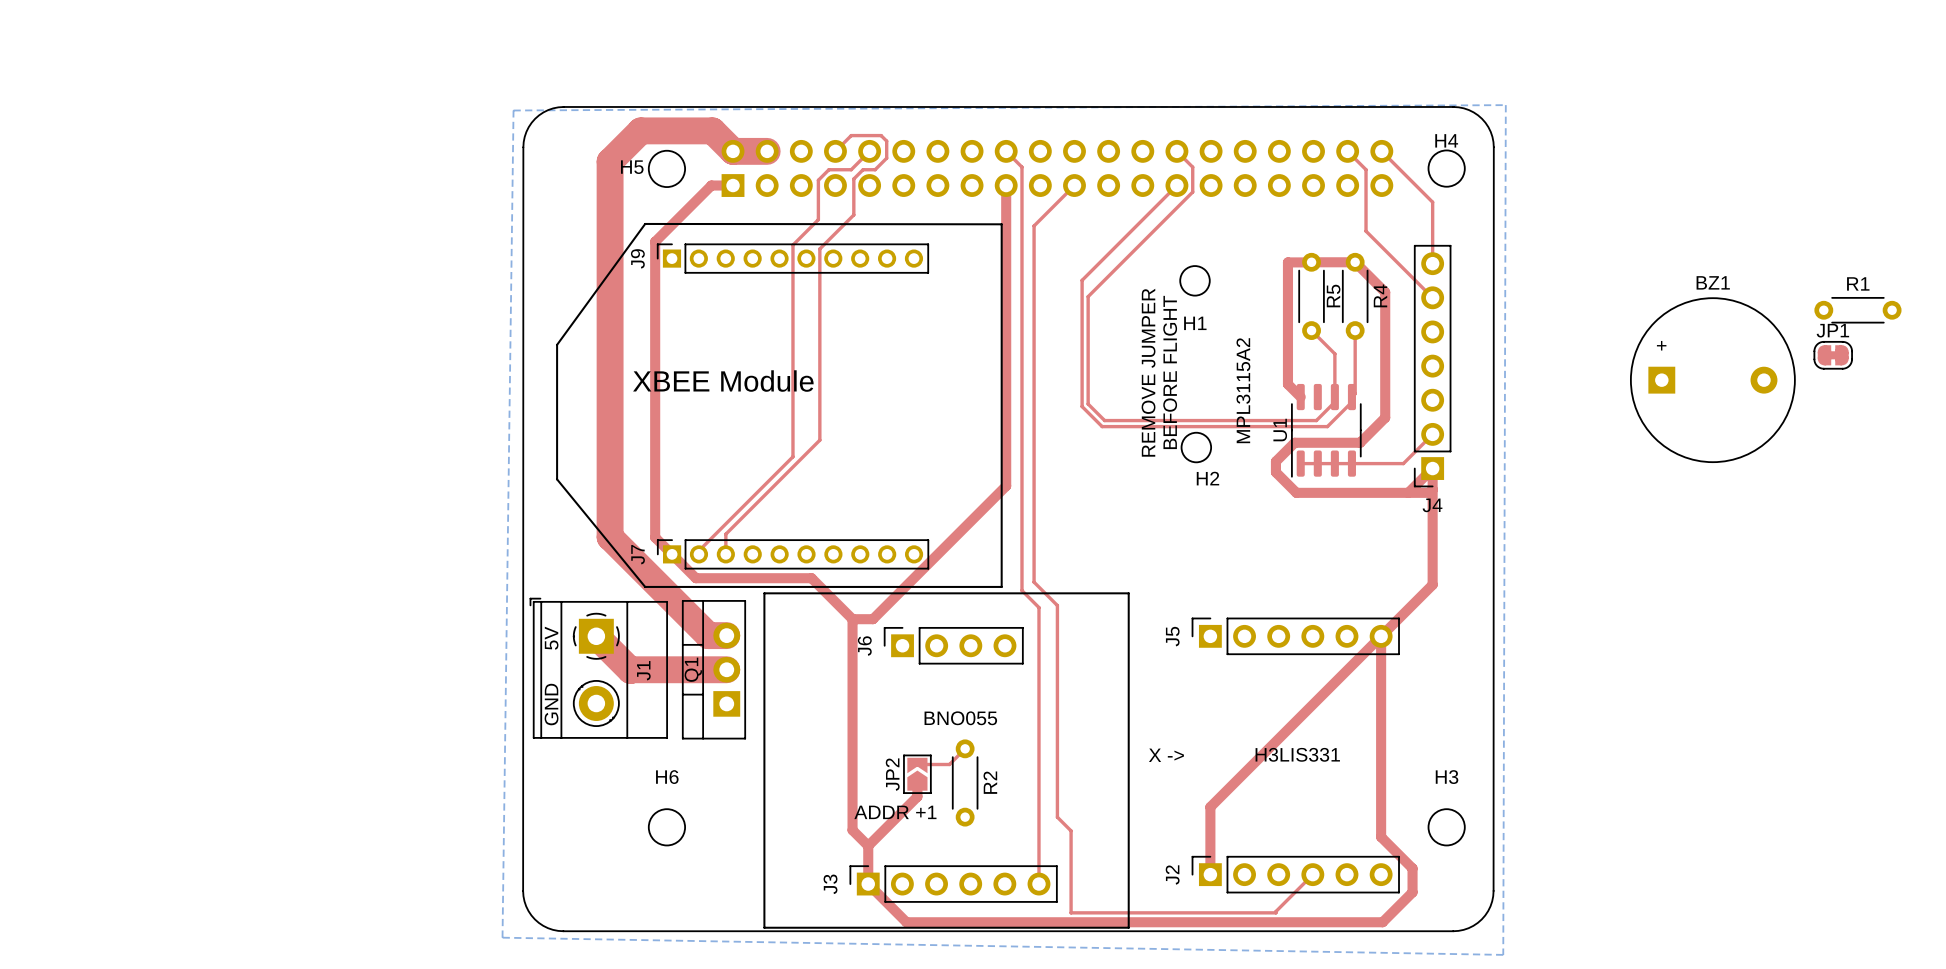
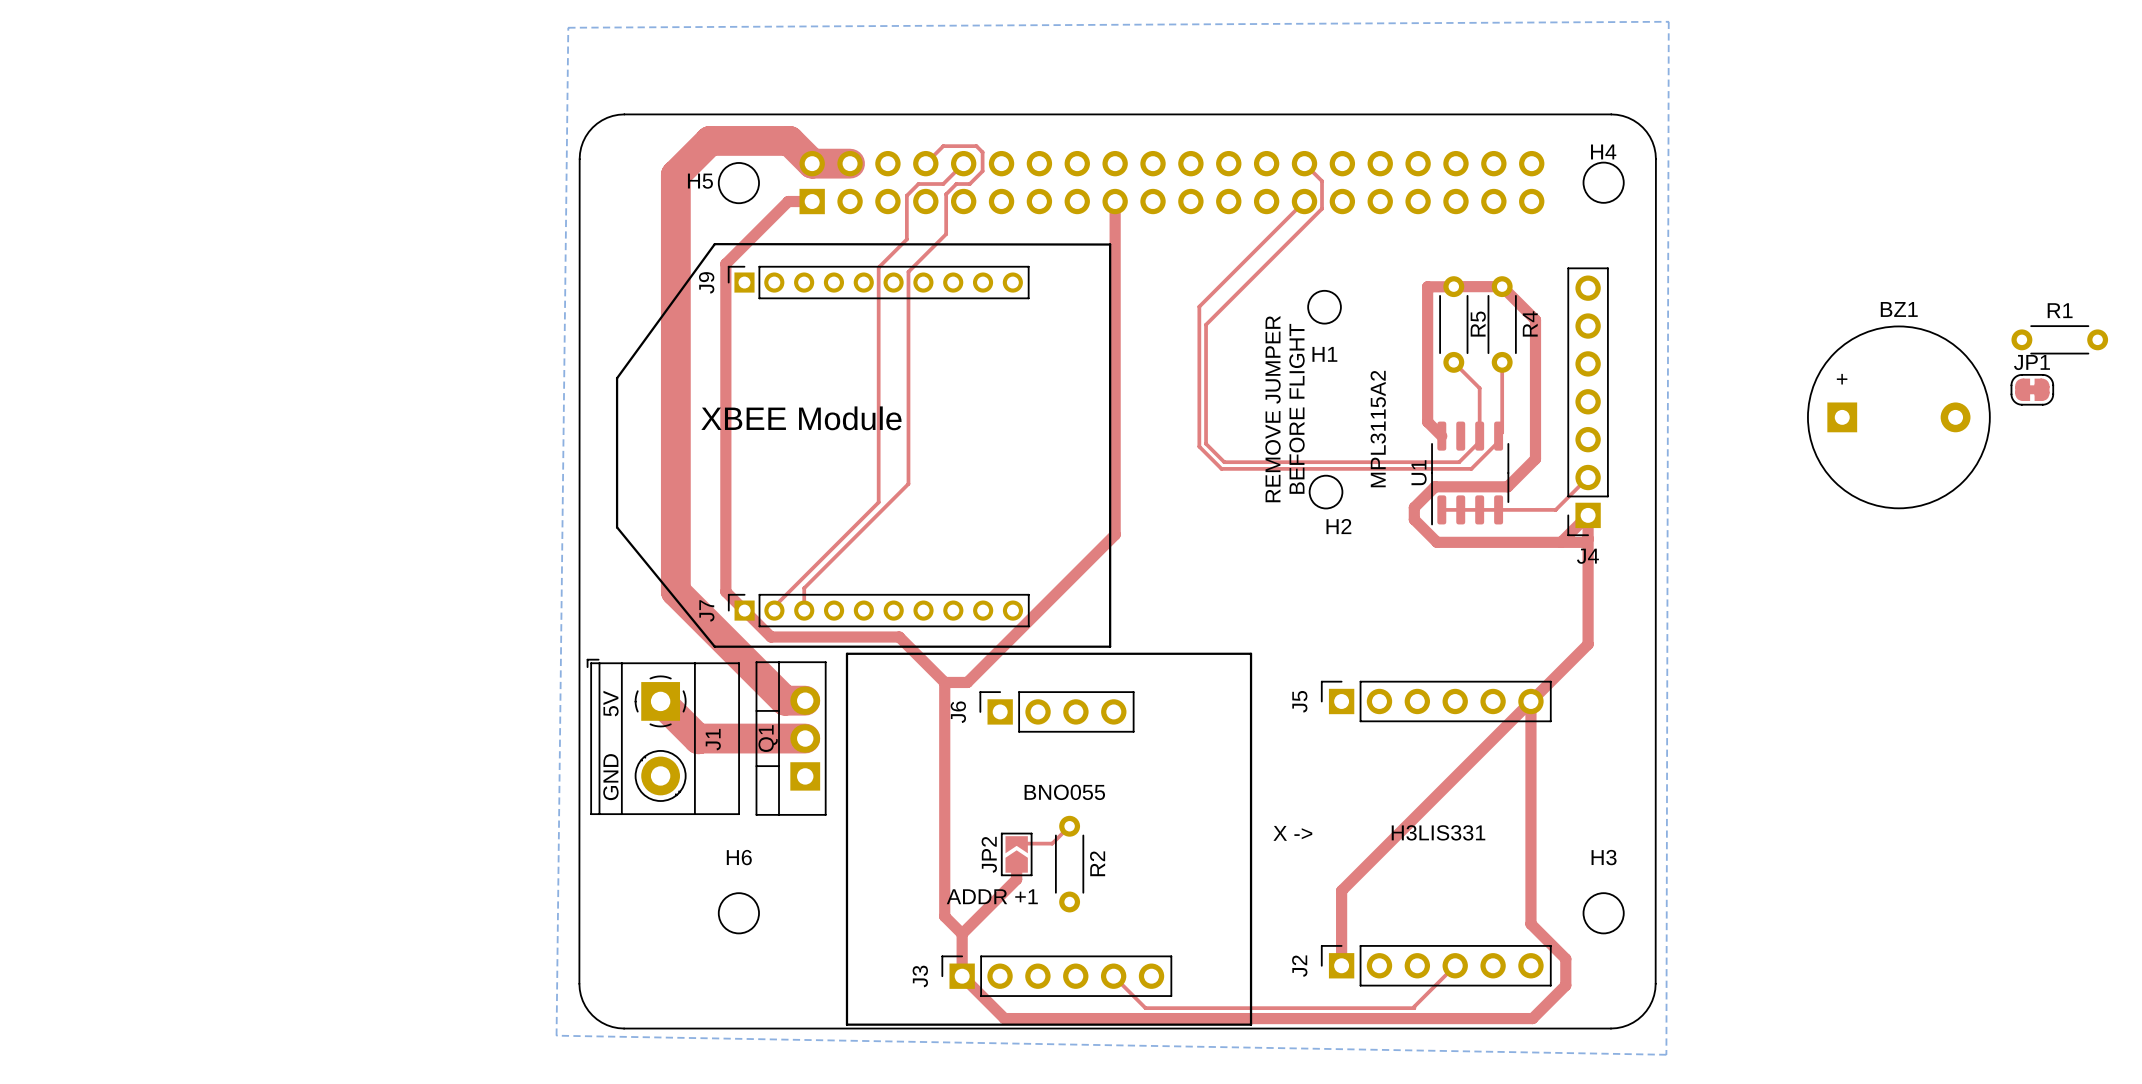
top track: (1006, 151) (1021, 167) (1021, 590) (1038, 607) (1038, 884) -> none
top track: (1347, 151) (1366, 169) (1366, 231) (1432, 297) -> none
top track: (1381, 151) (1432, 202) (1432, 263) -> none
top track: (1074, 185) (1034, 225) (1034, 582) (1057, 605) (1057, 817) (1071, 830) (1071, 912) -> (1113, 976) (1145, 1008) (1187, 1008)
bottom zone outline: (502, 937) (513, 110) (1505, 105) (1503, 954) -> (556, 1035) (568, 27) (1668, 21) (1666, 1054)

